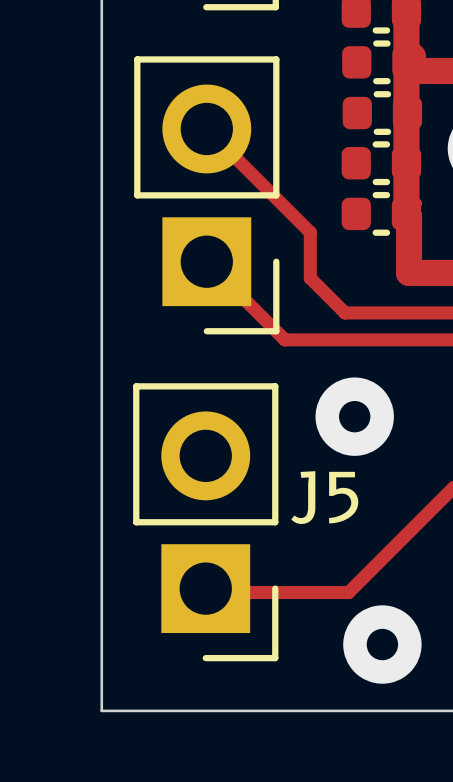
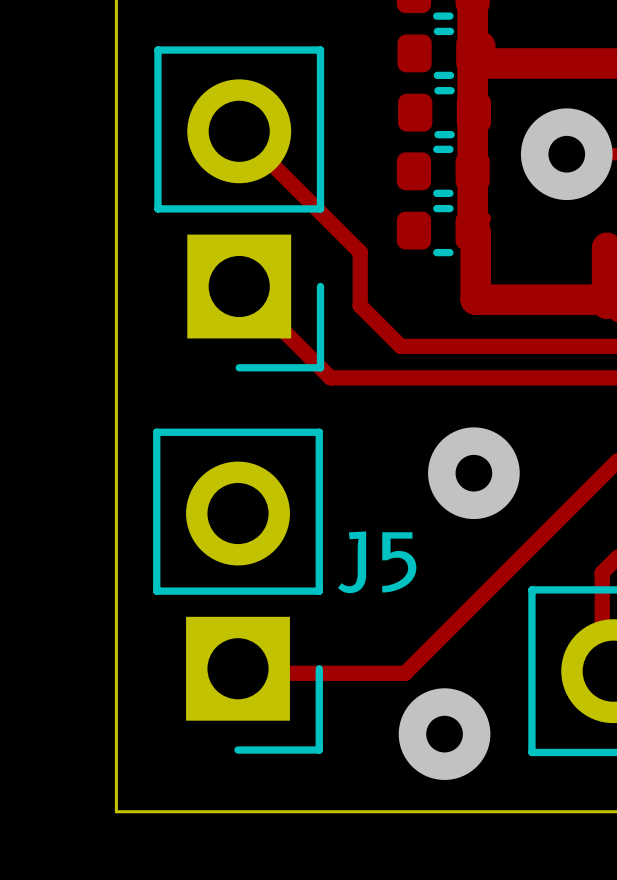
via position: (354, 416) -> (473, 473)

